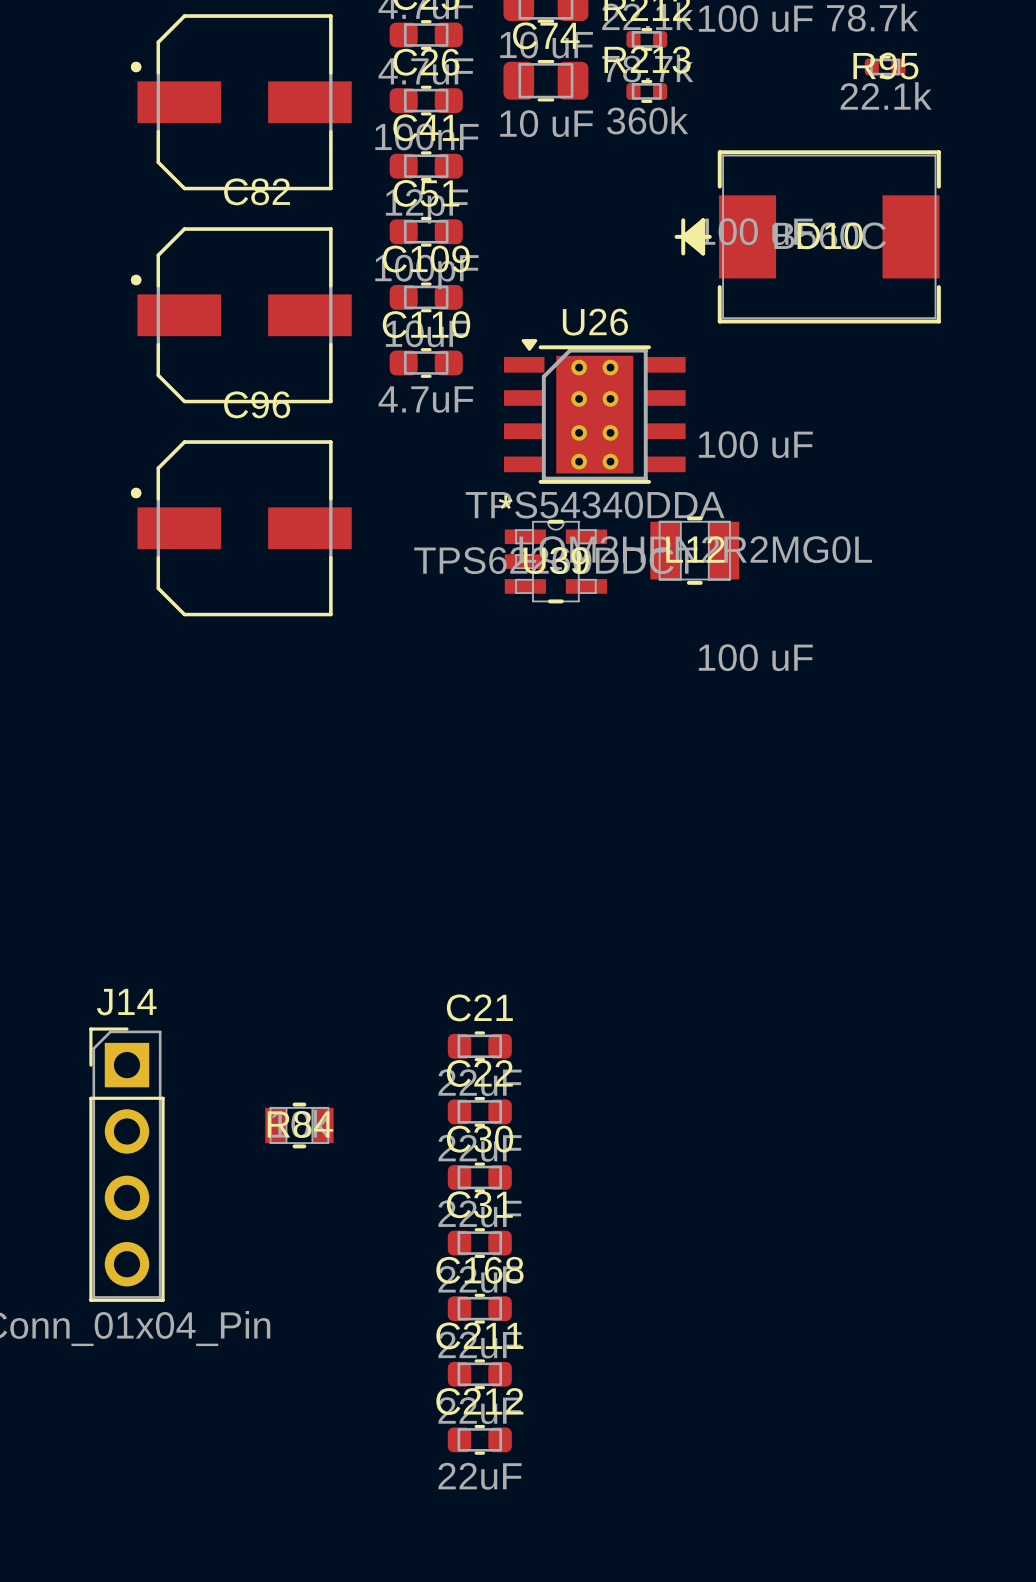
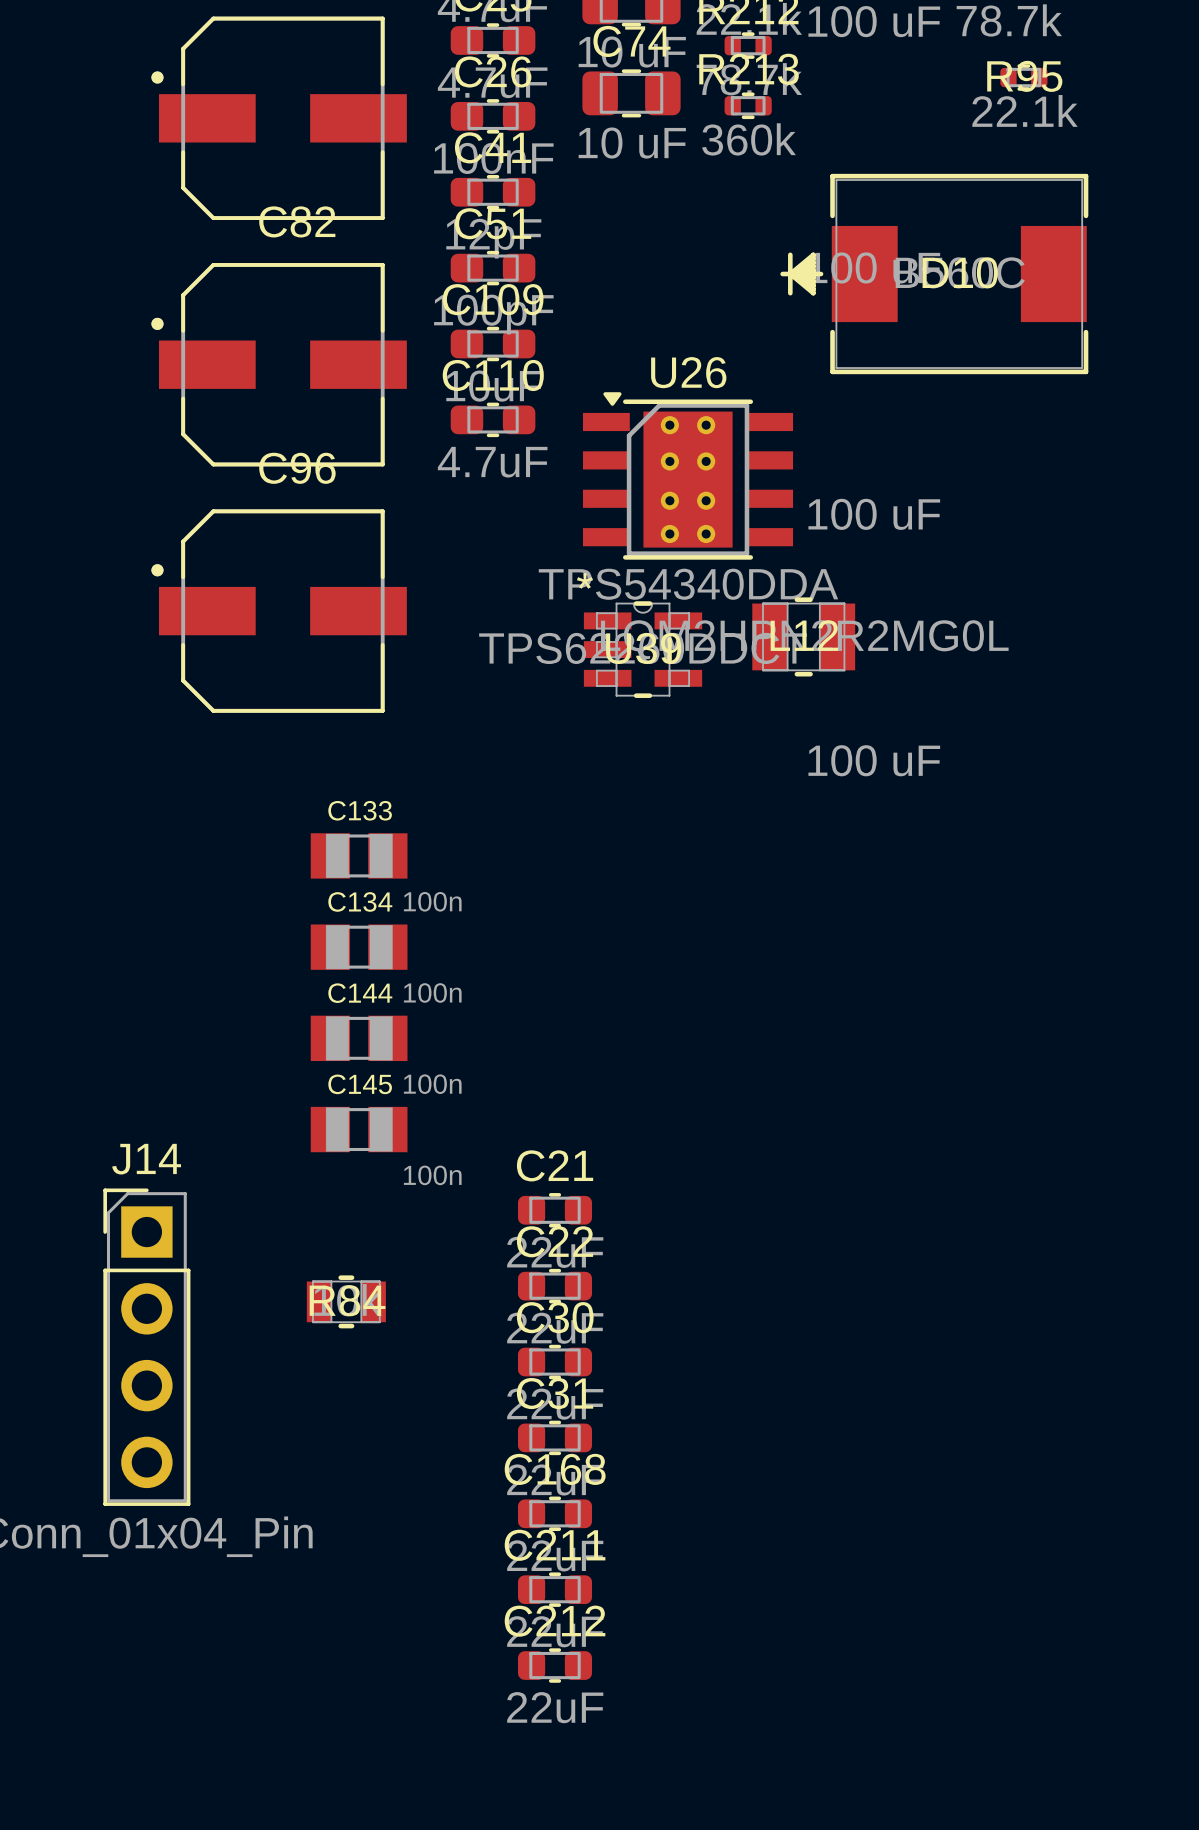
C133: none -> 100n (359, 855)
C134: none -> 100n (359, 947)
C144: none -> 100n (359, 1038)
C145: none -> 100n (359, 1129)

